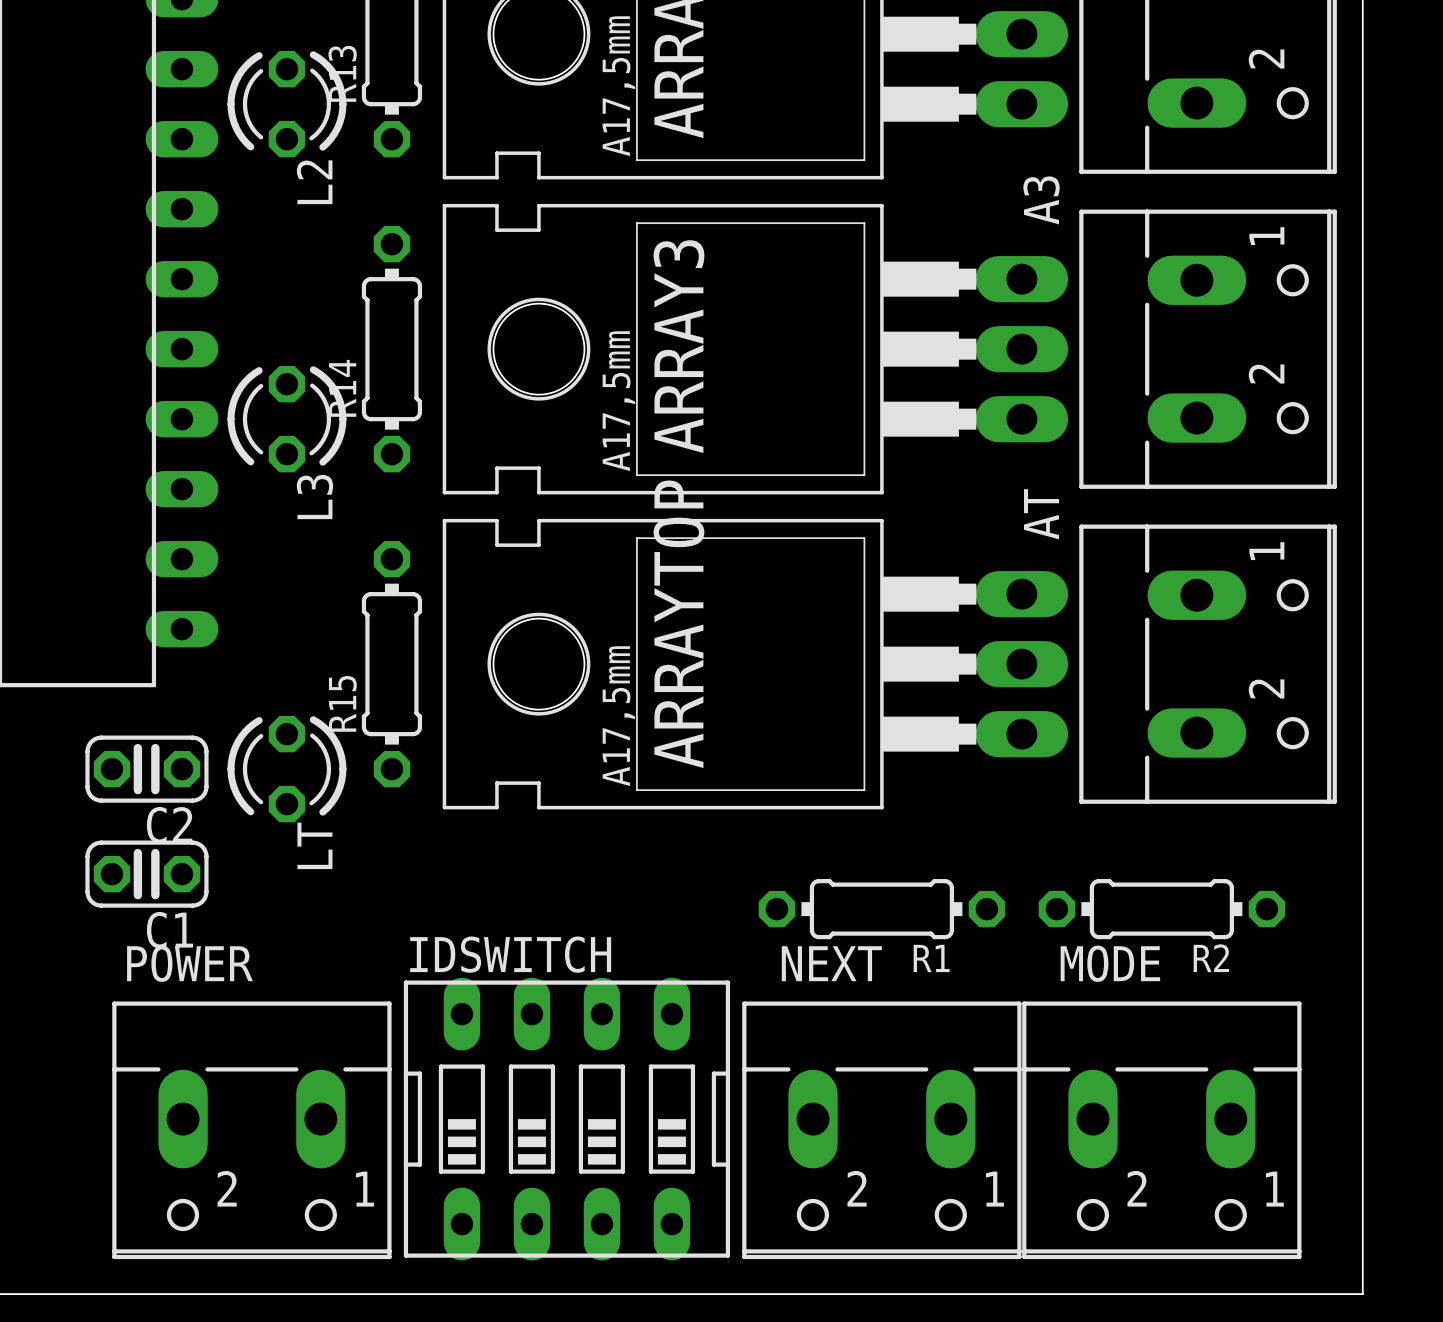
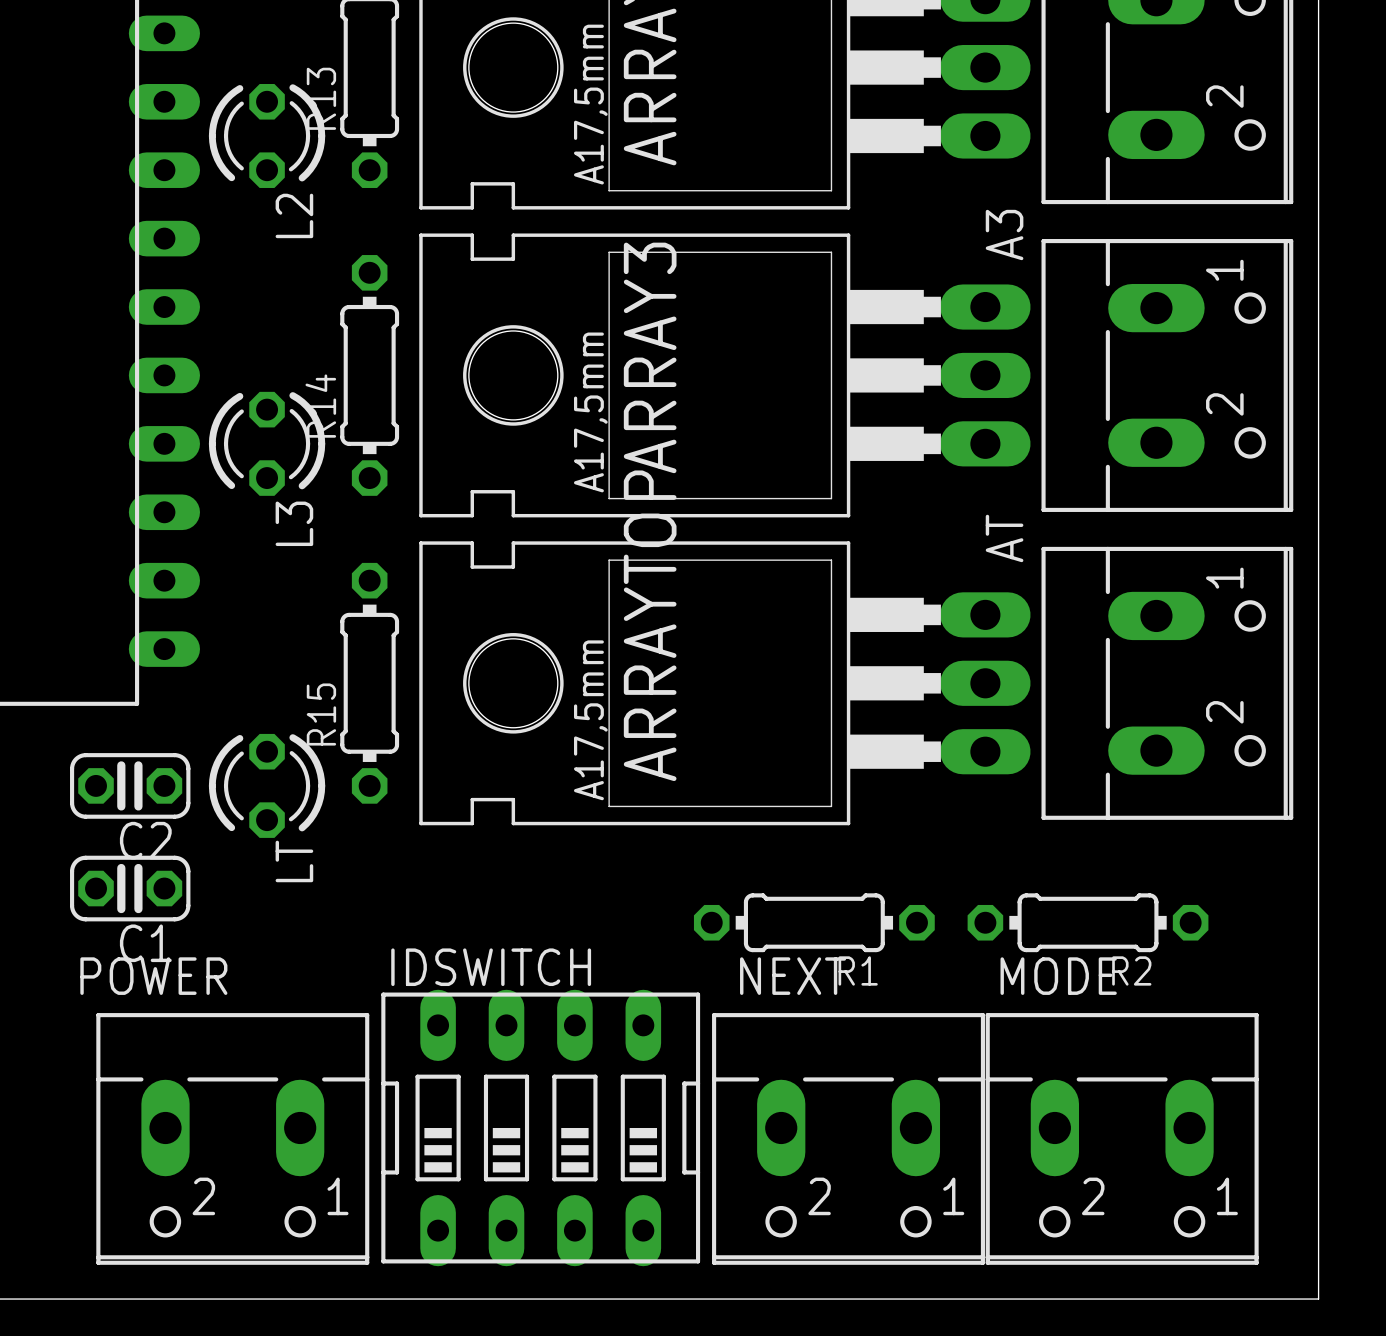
R1 position: (881, 909) -> (814, 922)
R2 position: (1161, 909) -> (1088, 922)

